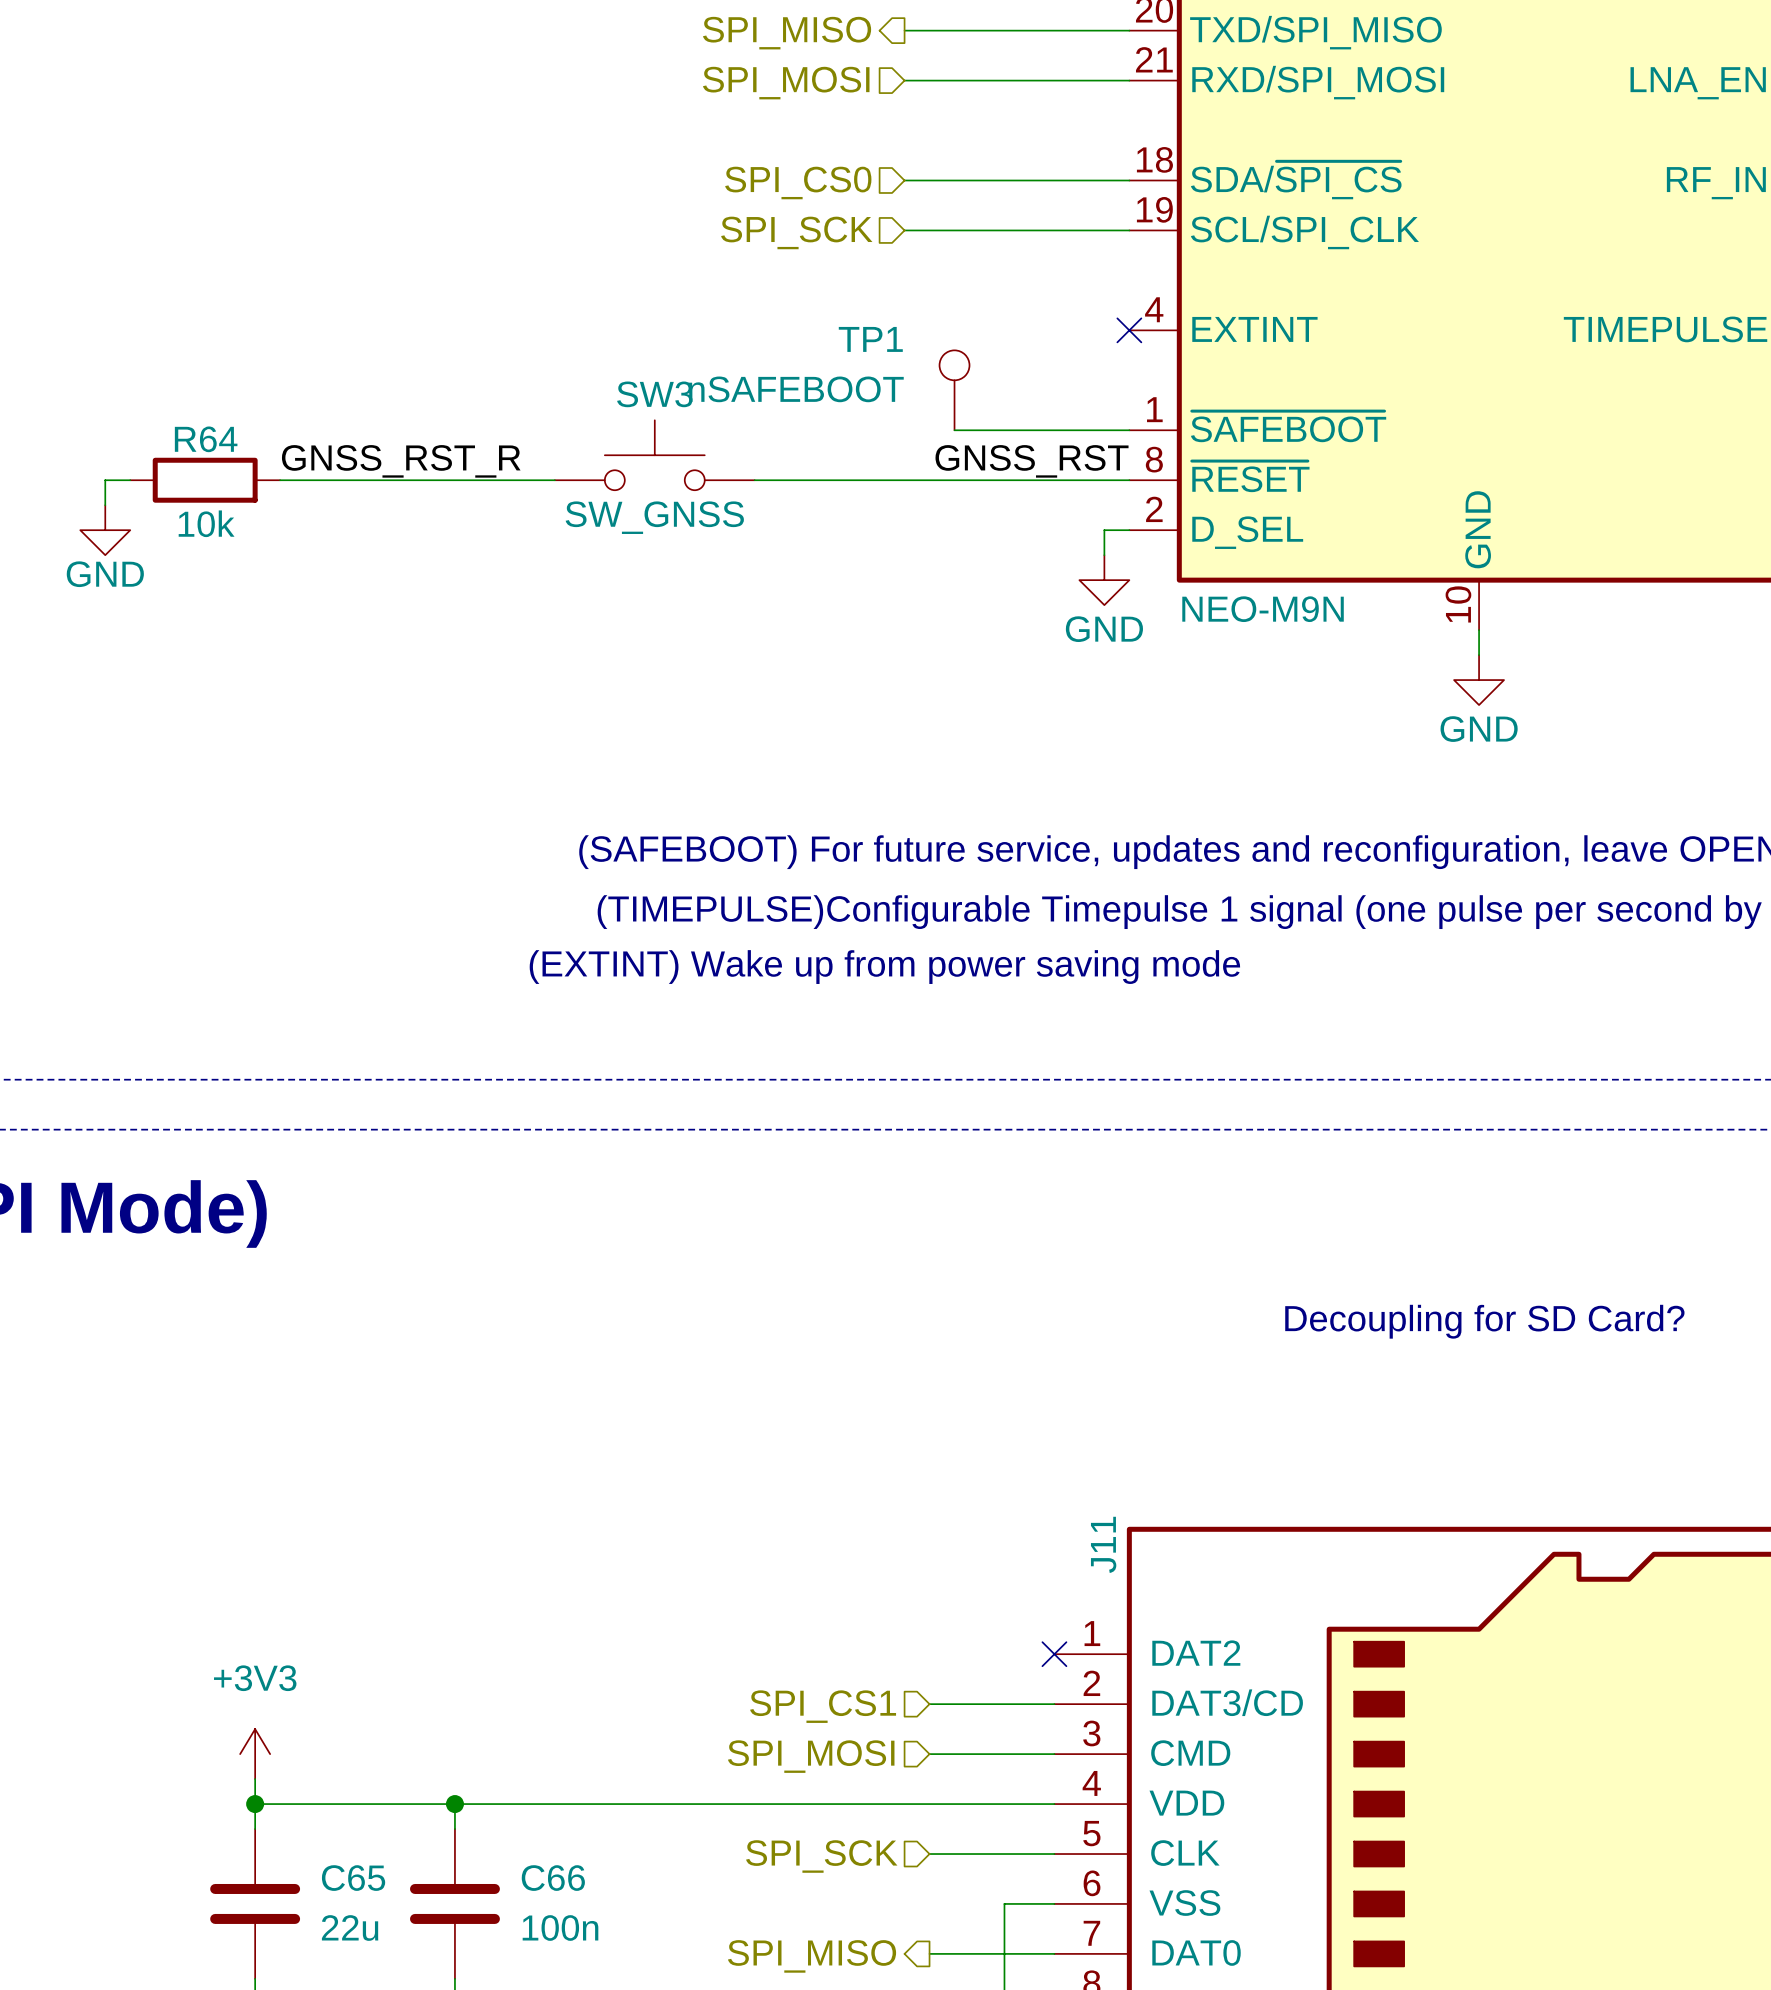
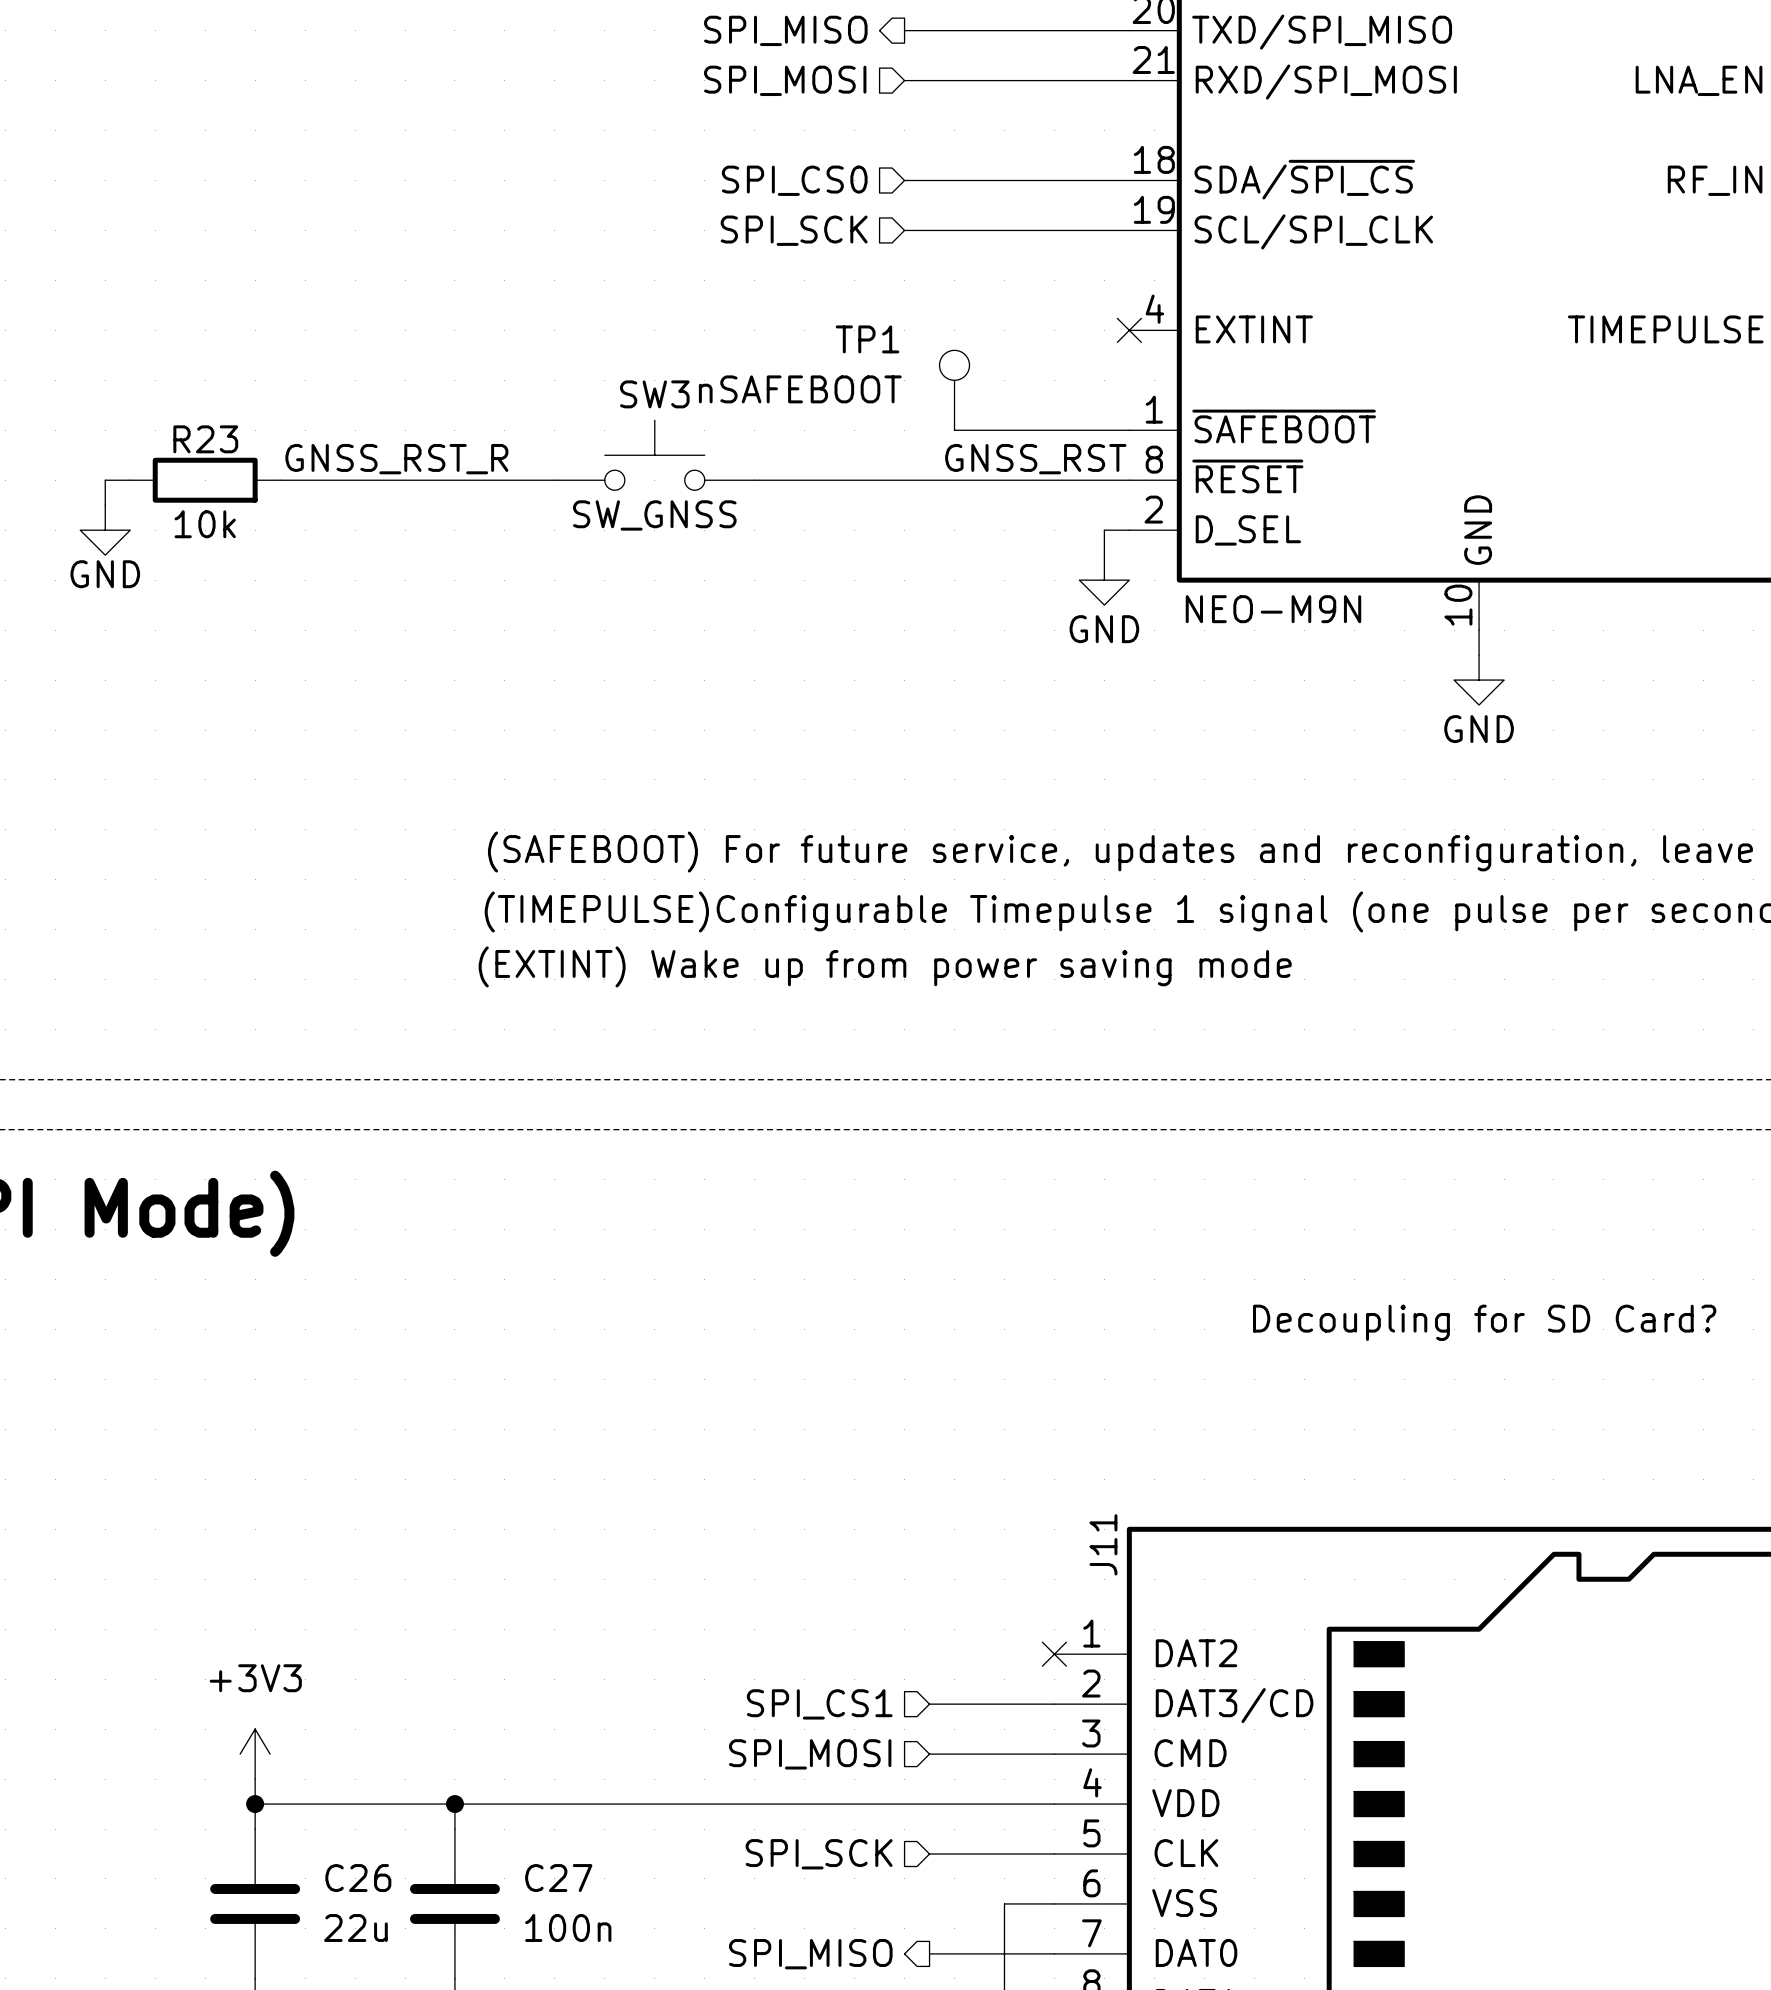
R64 name: R64 (206, 439) -> R23 (205, 439)
C65 name: C65 (353, 1878) -> C26 (358, 1878)
C66 name: C66 (553, 1878) -> C27 (558, 1878)

